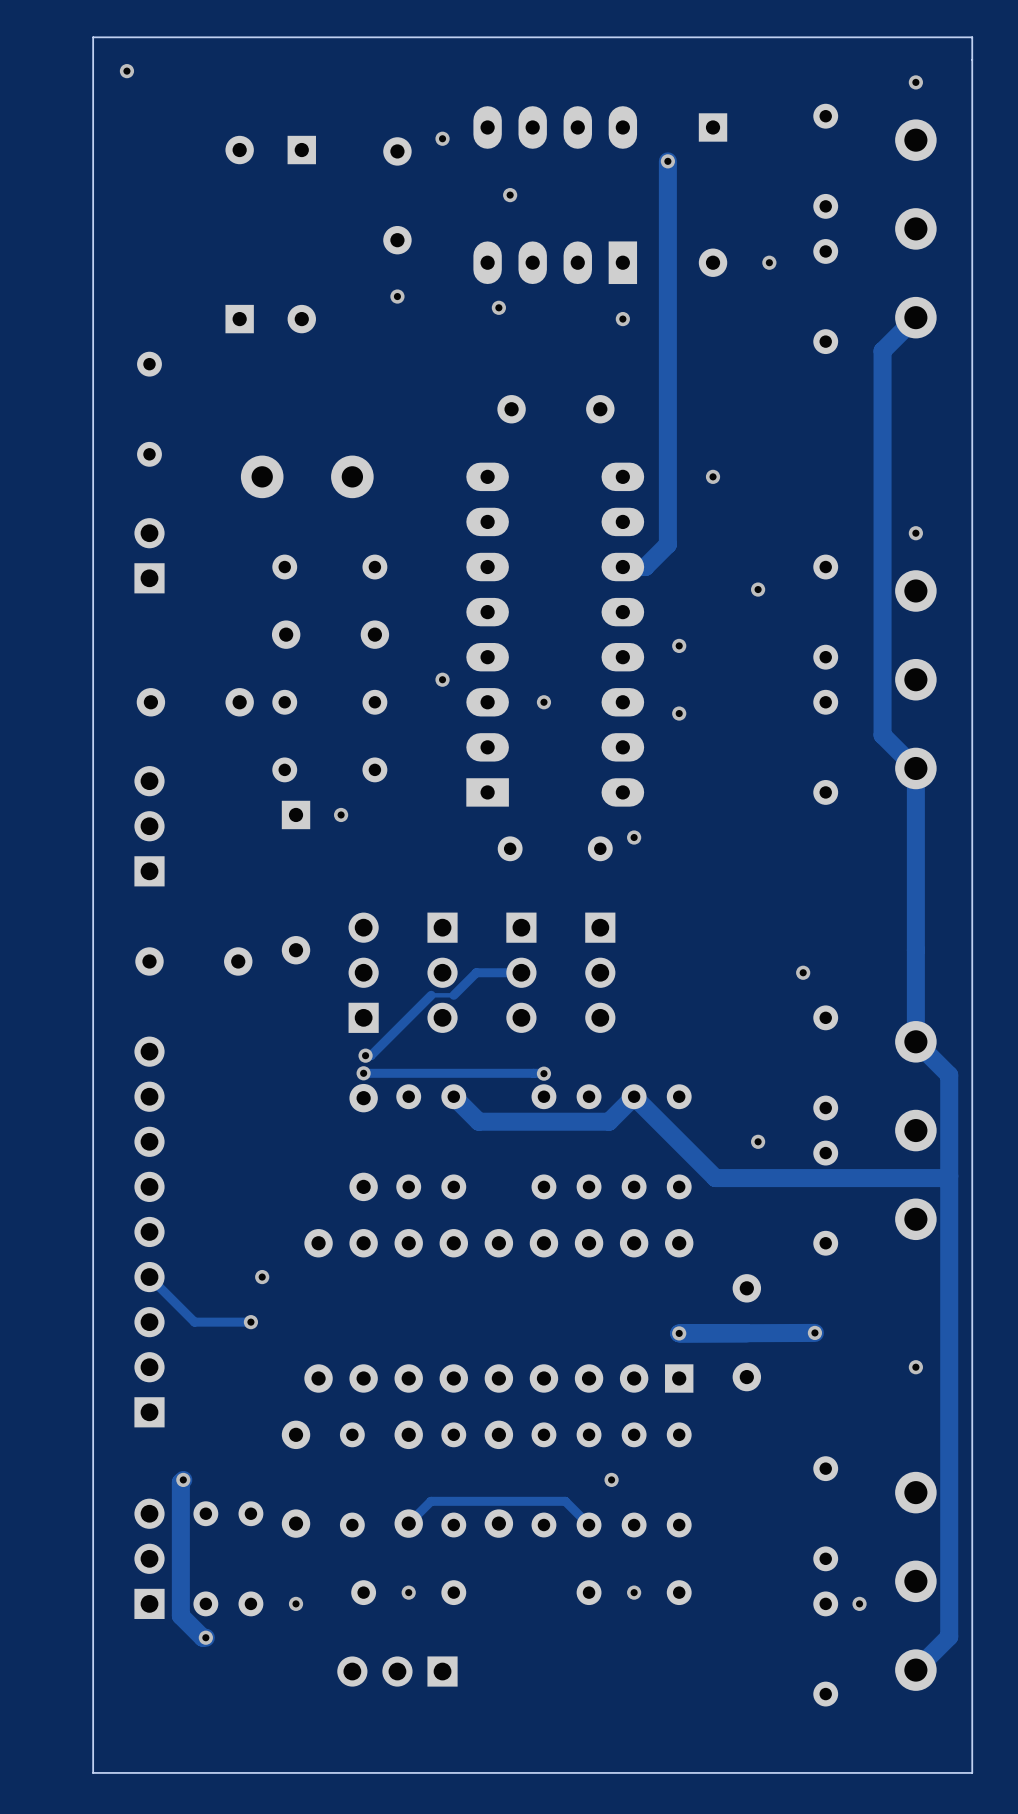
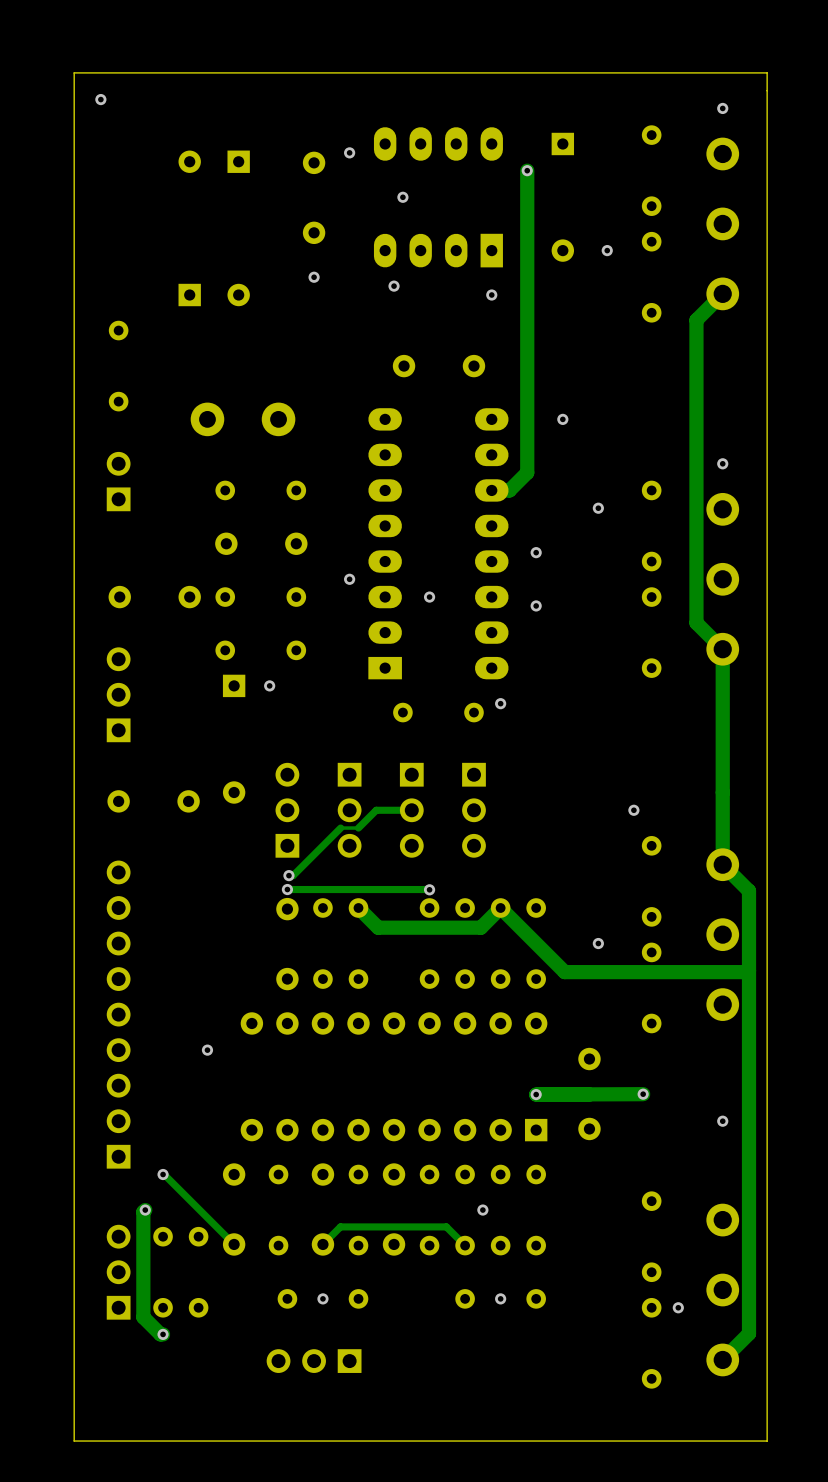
track: (149, 1277) (194, 1322) (250, 1322) -> none
via: (250, 1322) -> none
track: none -> (163, 1174) (234, 1244)
via: none -> (163, 1174)
via: (296, 1603) -> none

